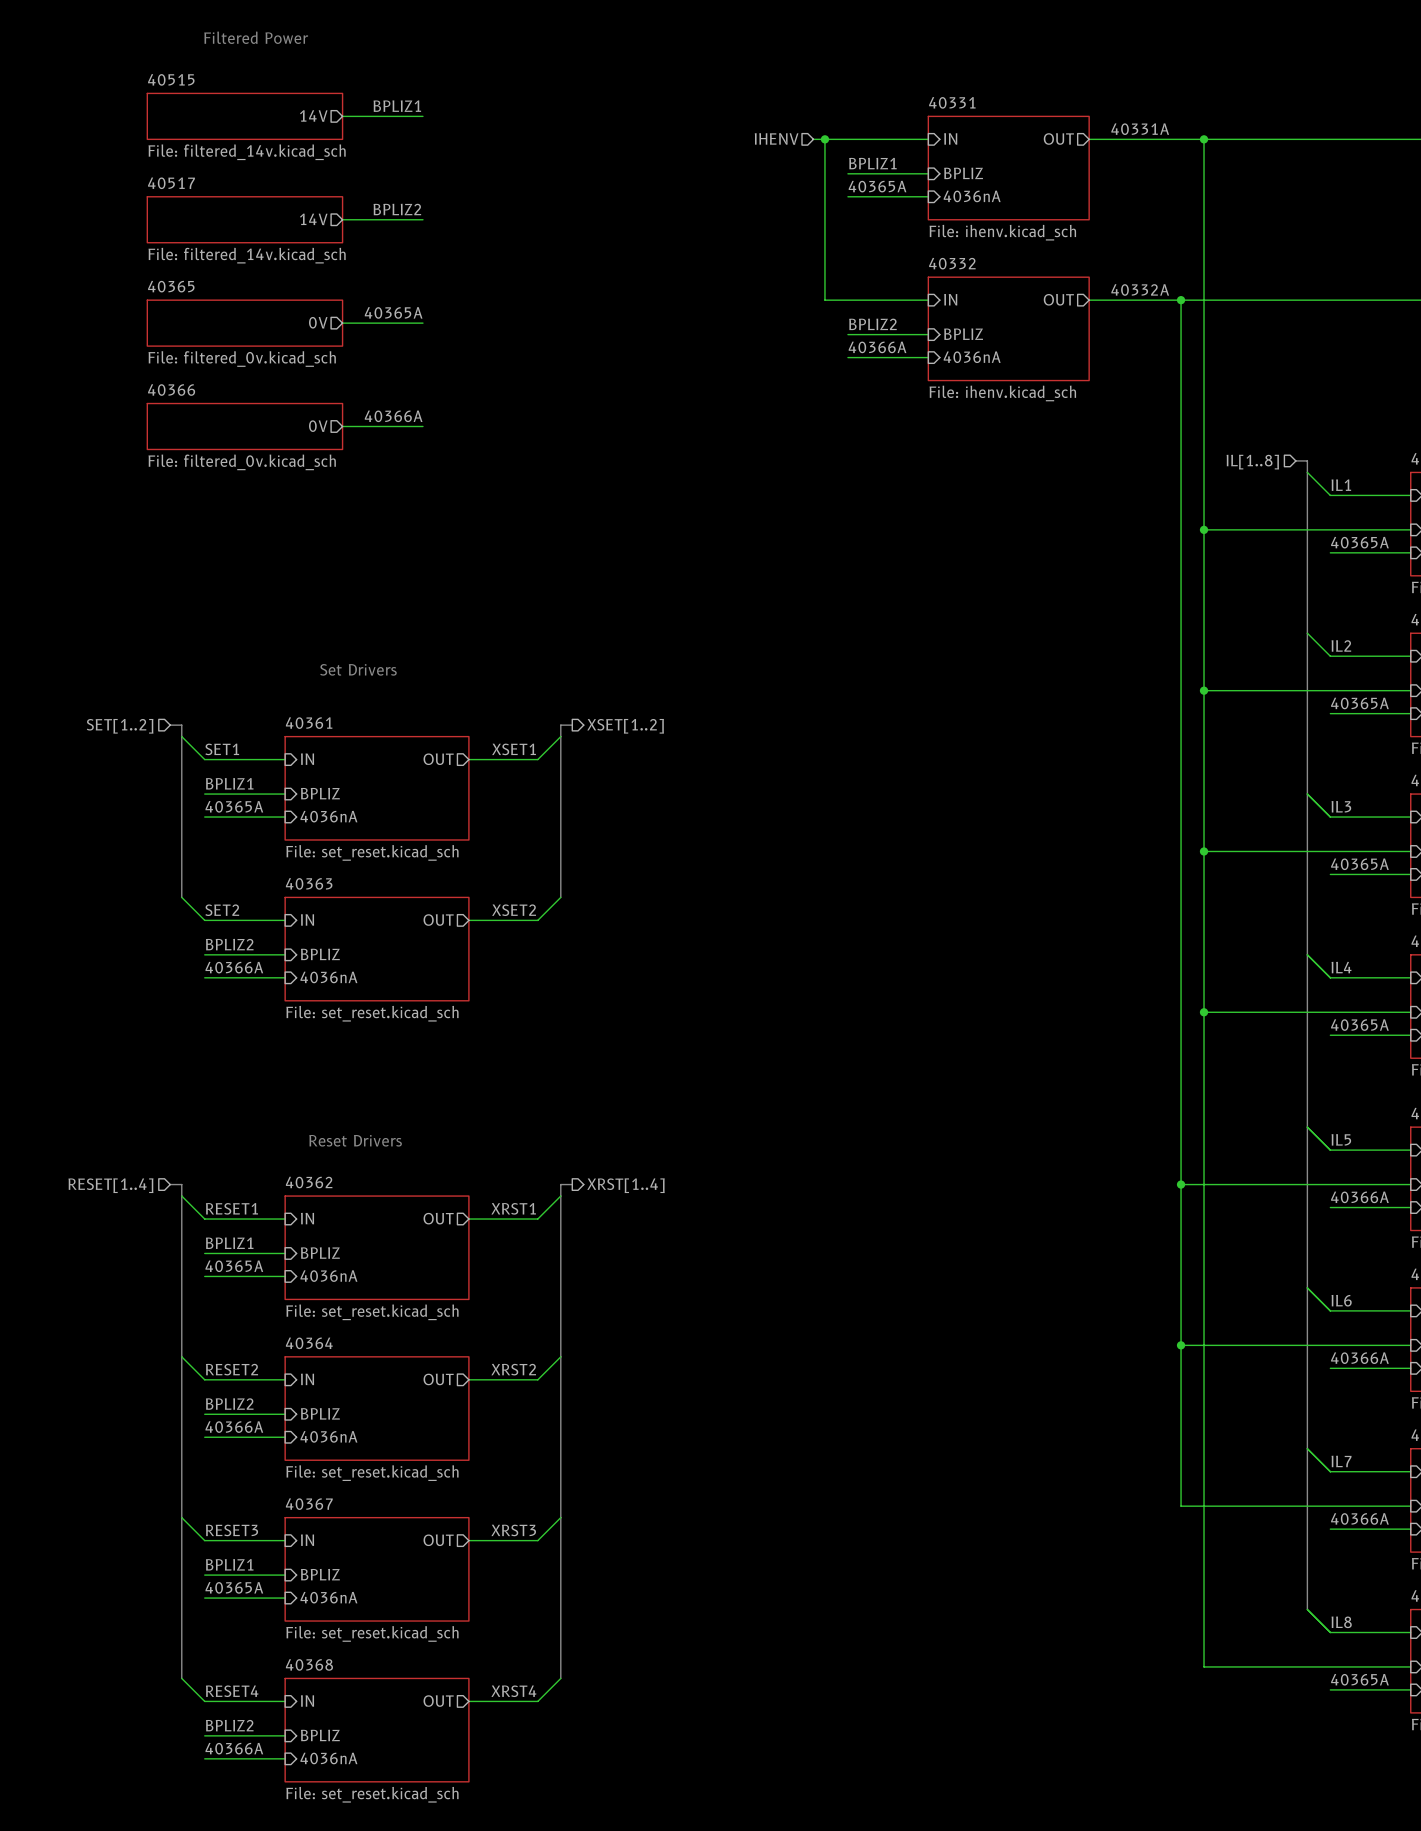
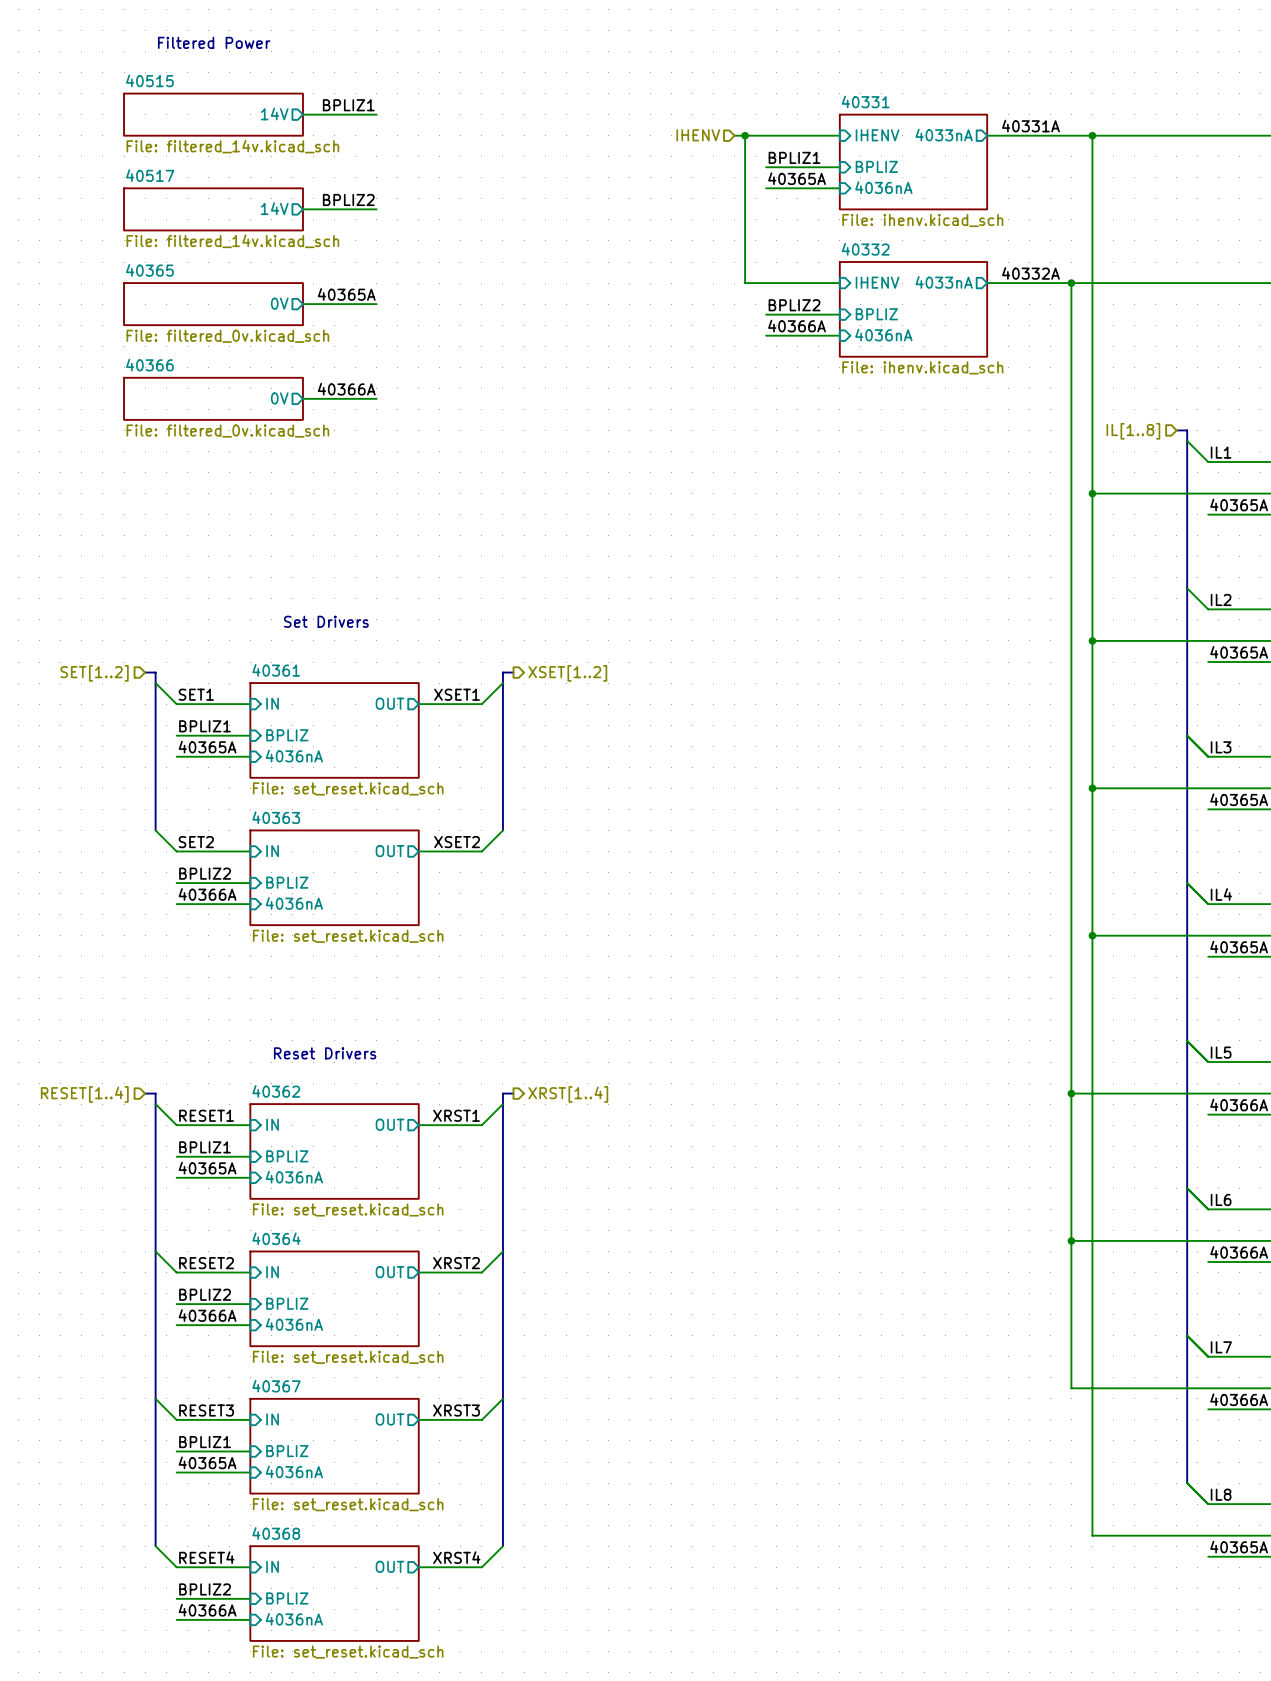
sheet pin: IN (950, 138) -> IHENV (877, 135)
sheet pin: OUT (1058, 138) -> 4033nA (944, 135)
sheet pin: IN (950, 299) -> IHENV (877, 282)
sheet pin: OUT (1058, 299) -> 4033nA (944, 282)

